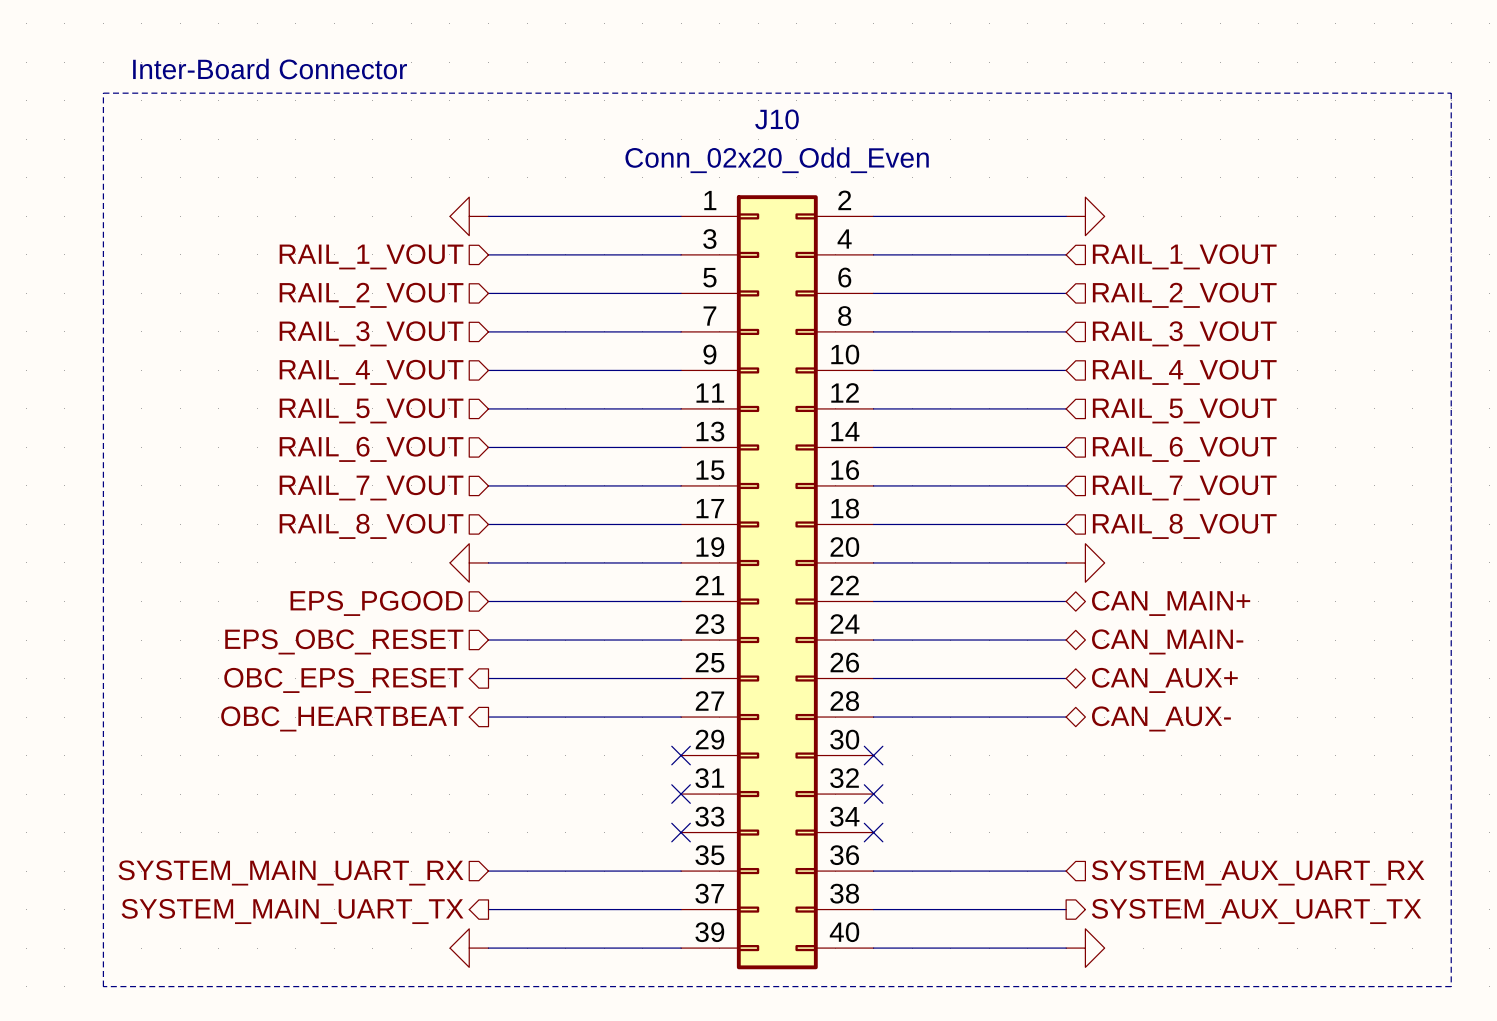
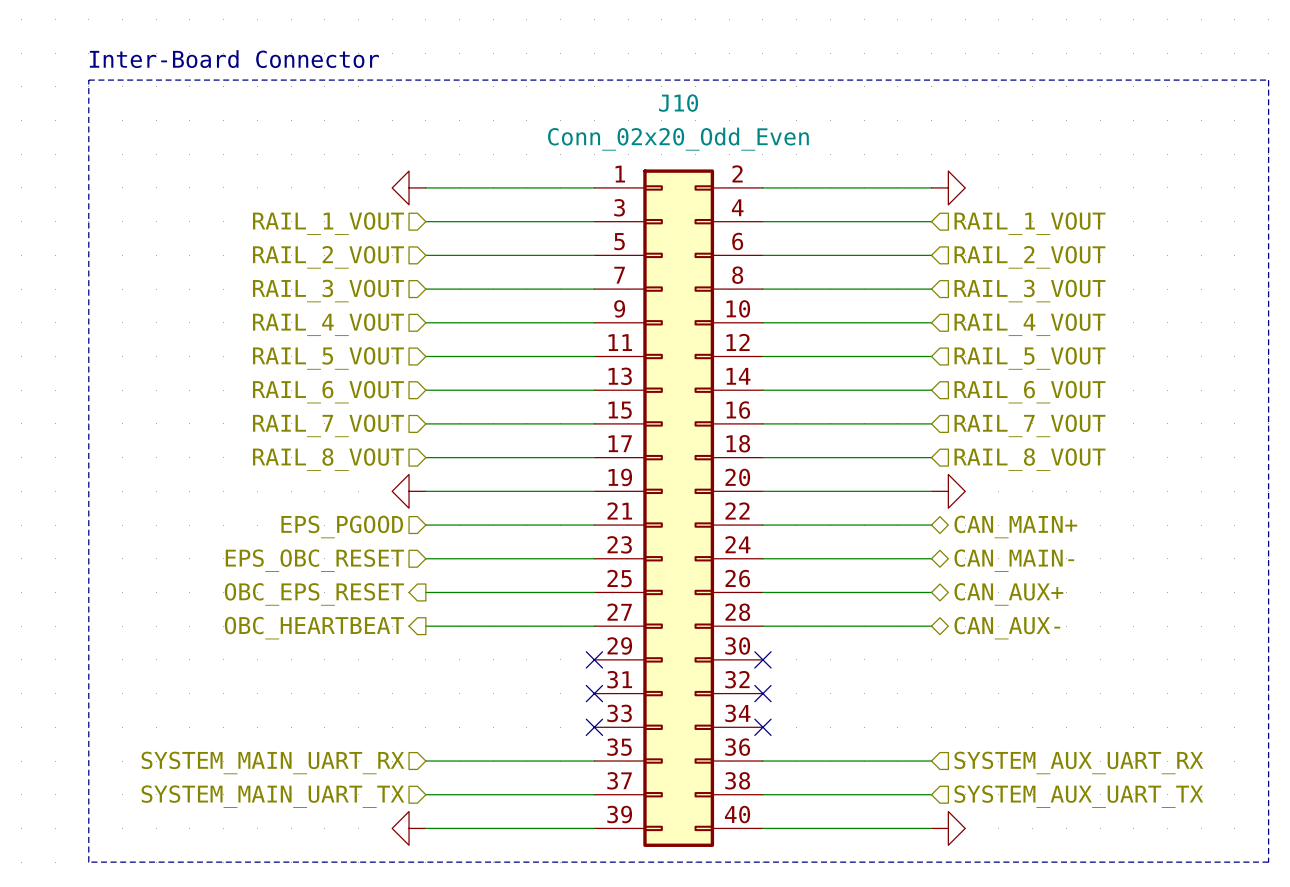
hierarchical label shape: output (292, 911) -> input (272, 796)
hierarchical label shape: output (1256, 911) -> input (1078, 796)

